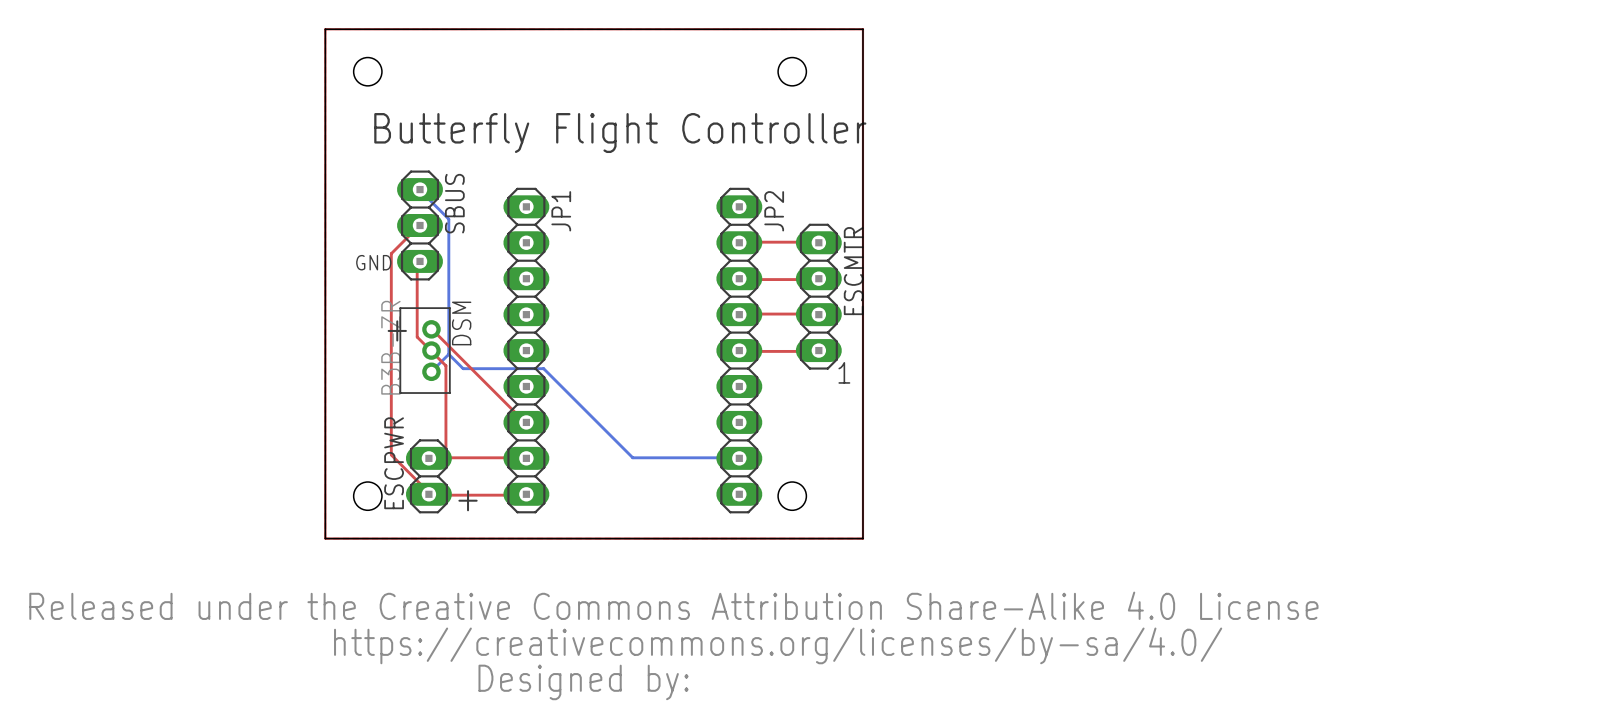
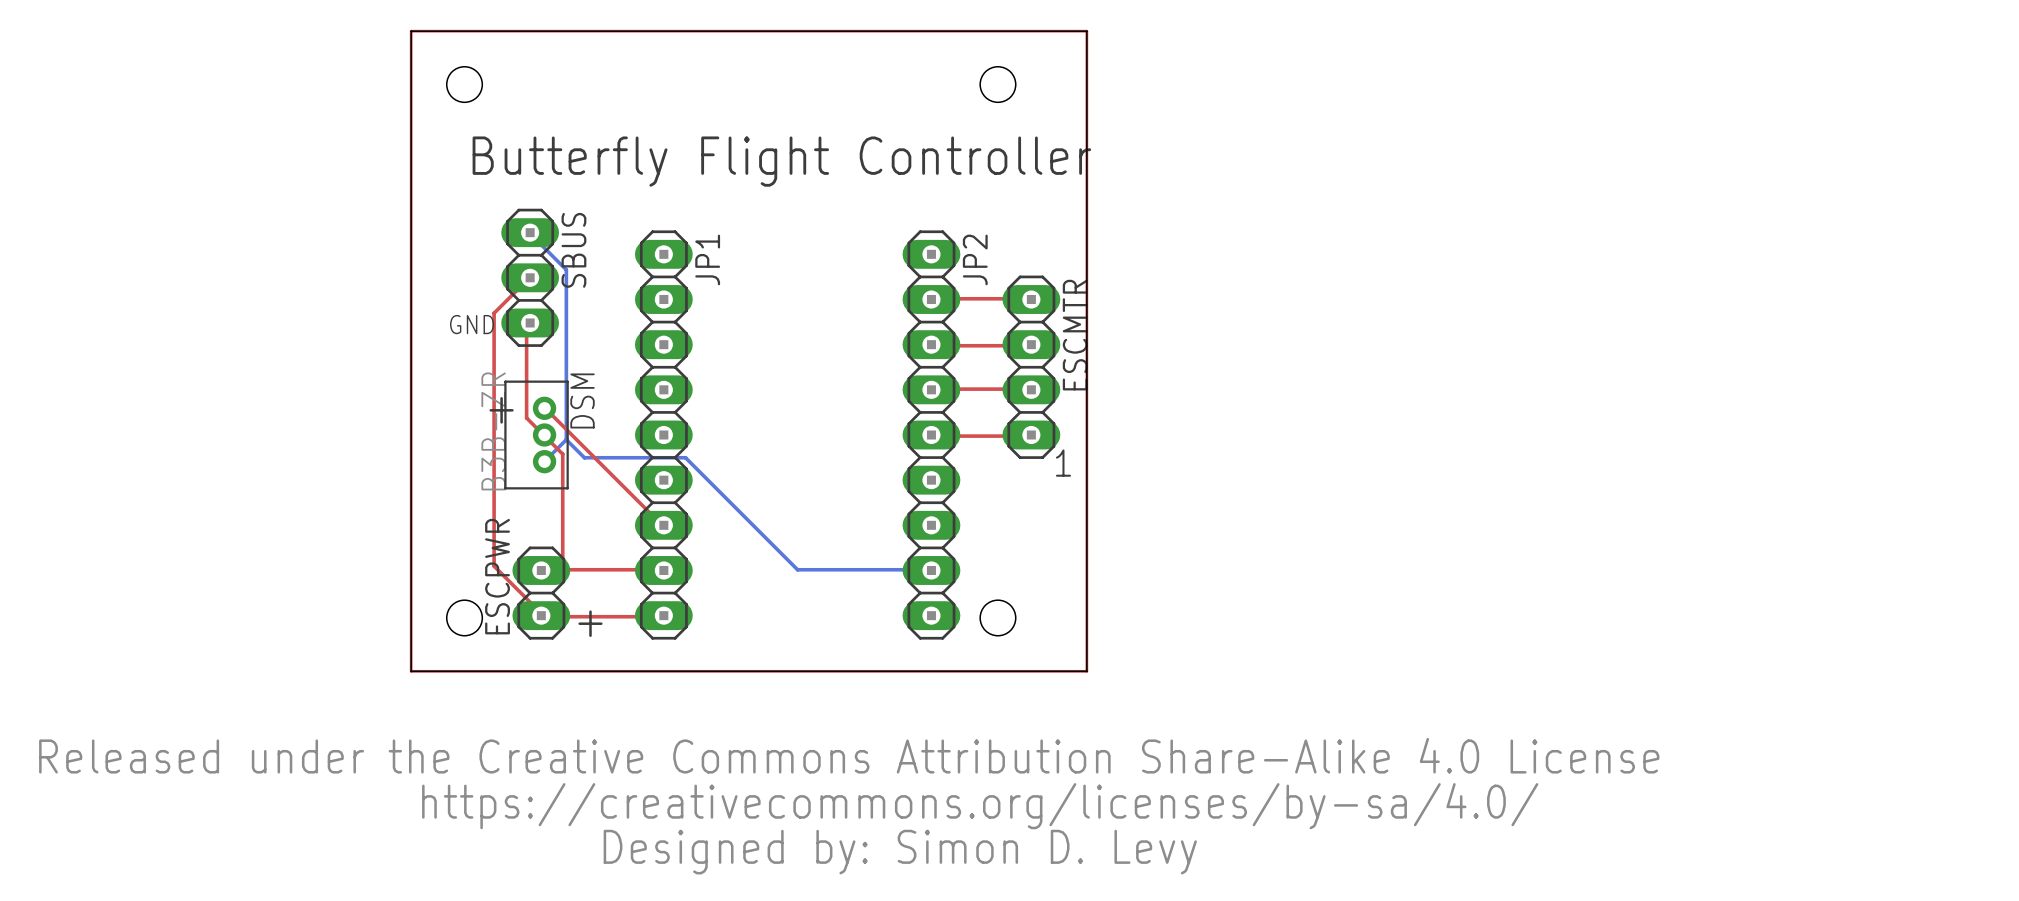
drawing shape: [29, 591, 1319, 701] -> [39, 737, 1660, 875]

